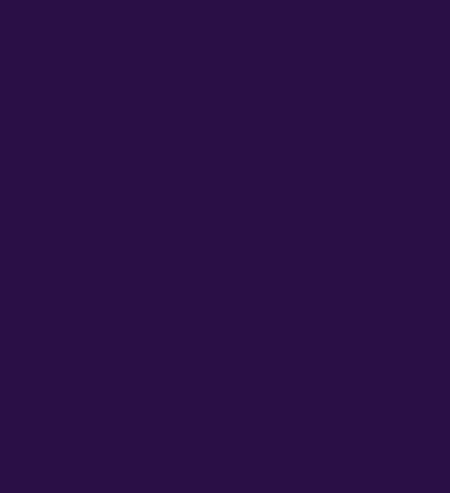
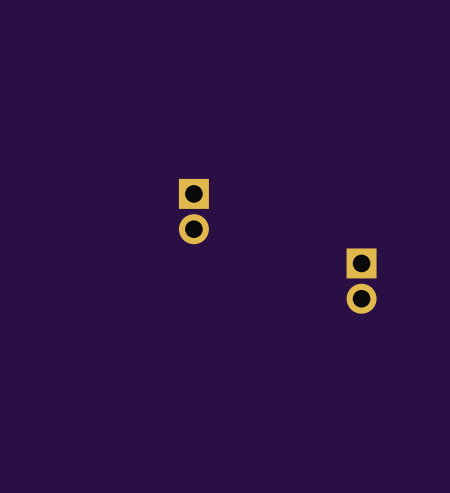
part: none -> (193, 211)
part: none -> (361, 281)

